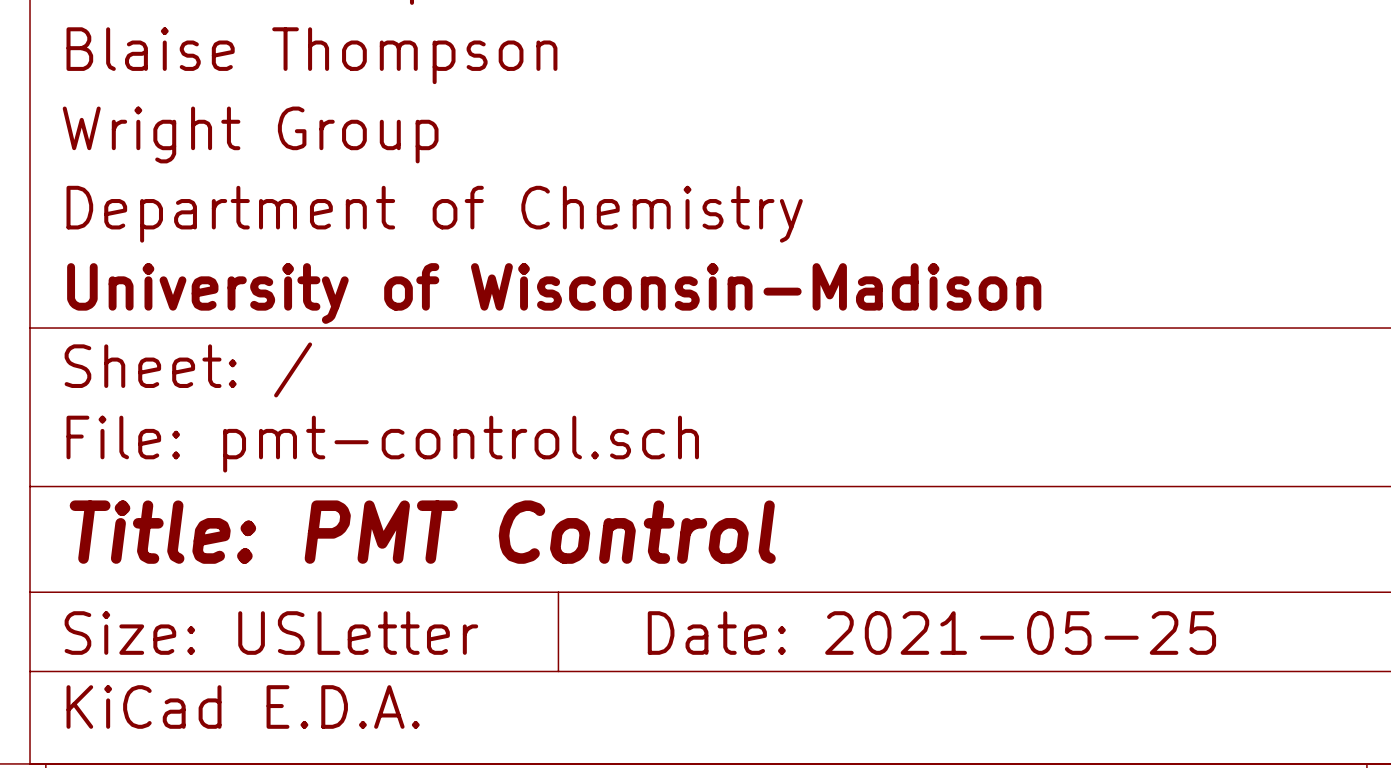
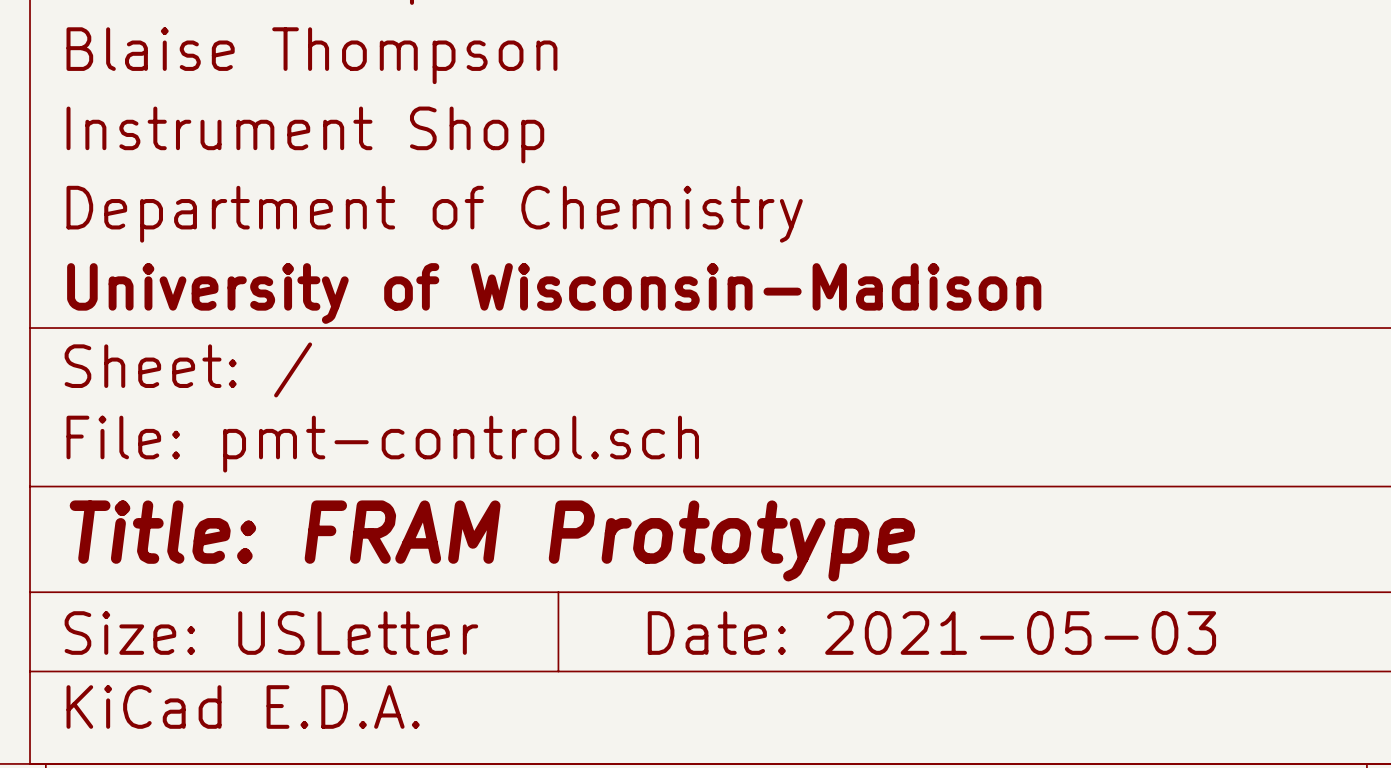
title block: Wright Group (250, 134) -> Instrument Shop (305, 134)
title block: Title: PMT Control (422, 532) -> Title: FRAM Prototype (492, 540)
title block: Date: 2021-05-25 (931, 633) -> Date: 2021-05-03 (931, 633)

